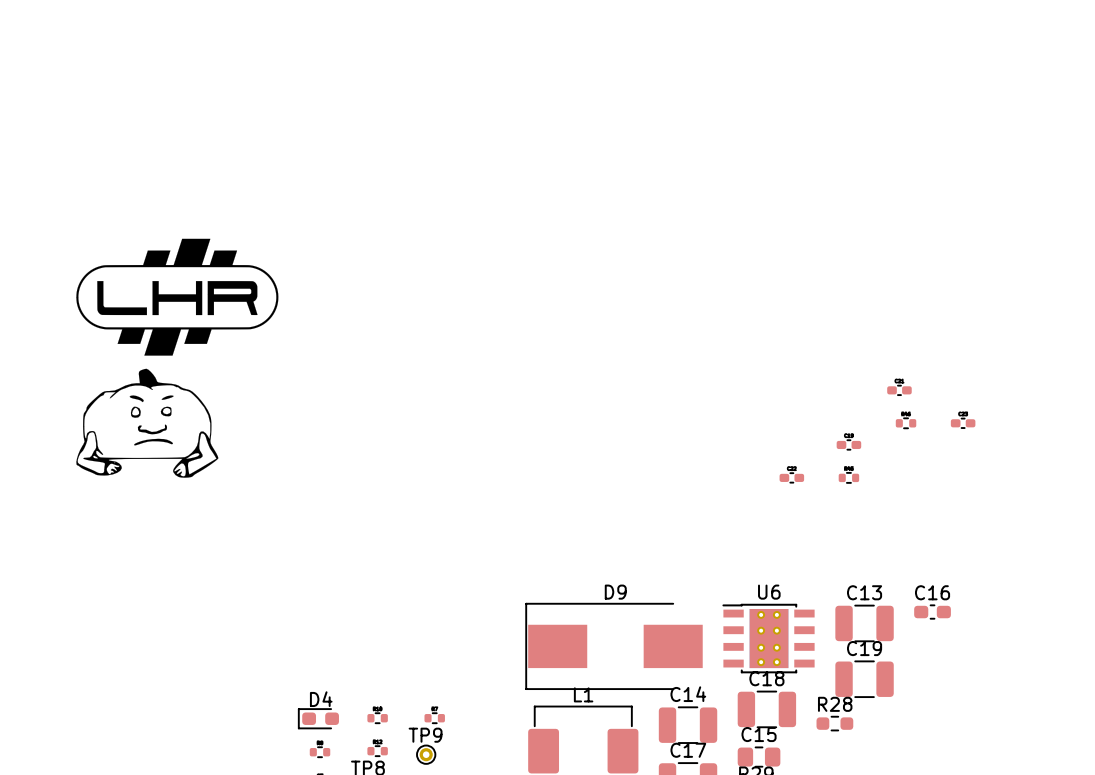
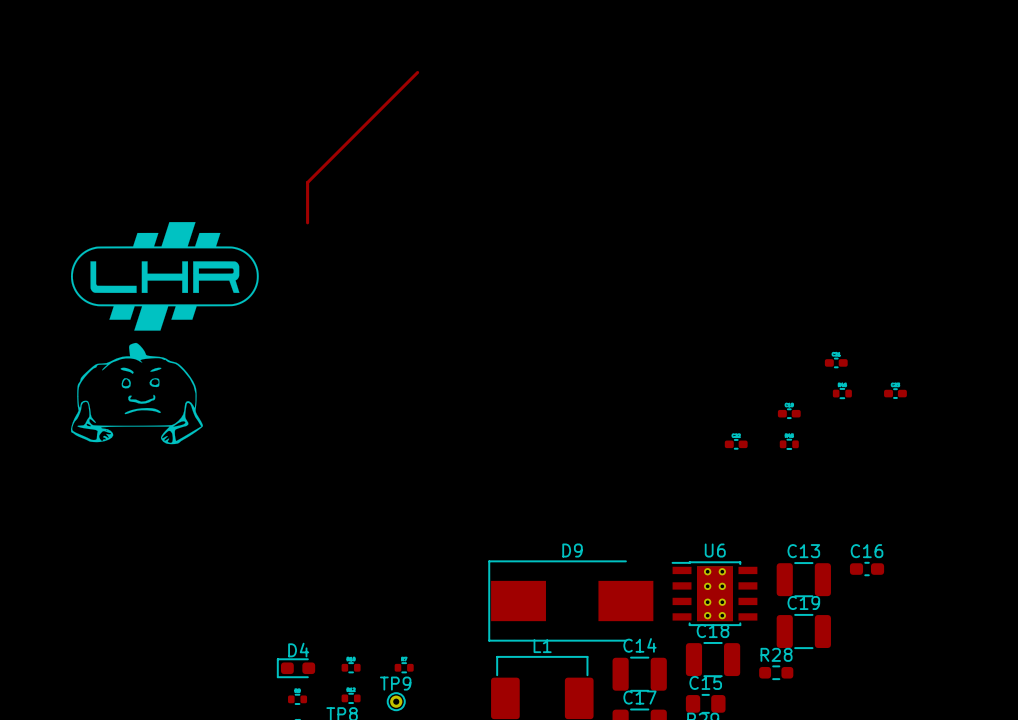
top track: none -> (417, 72) (307, 182) (307, 222)

